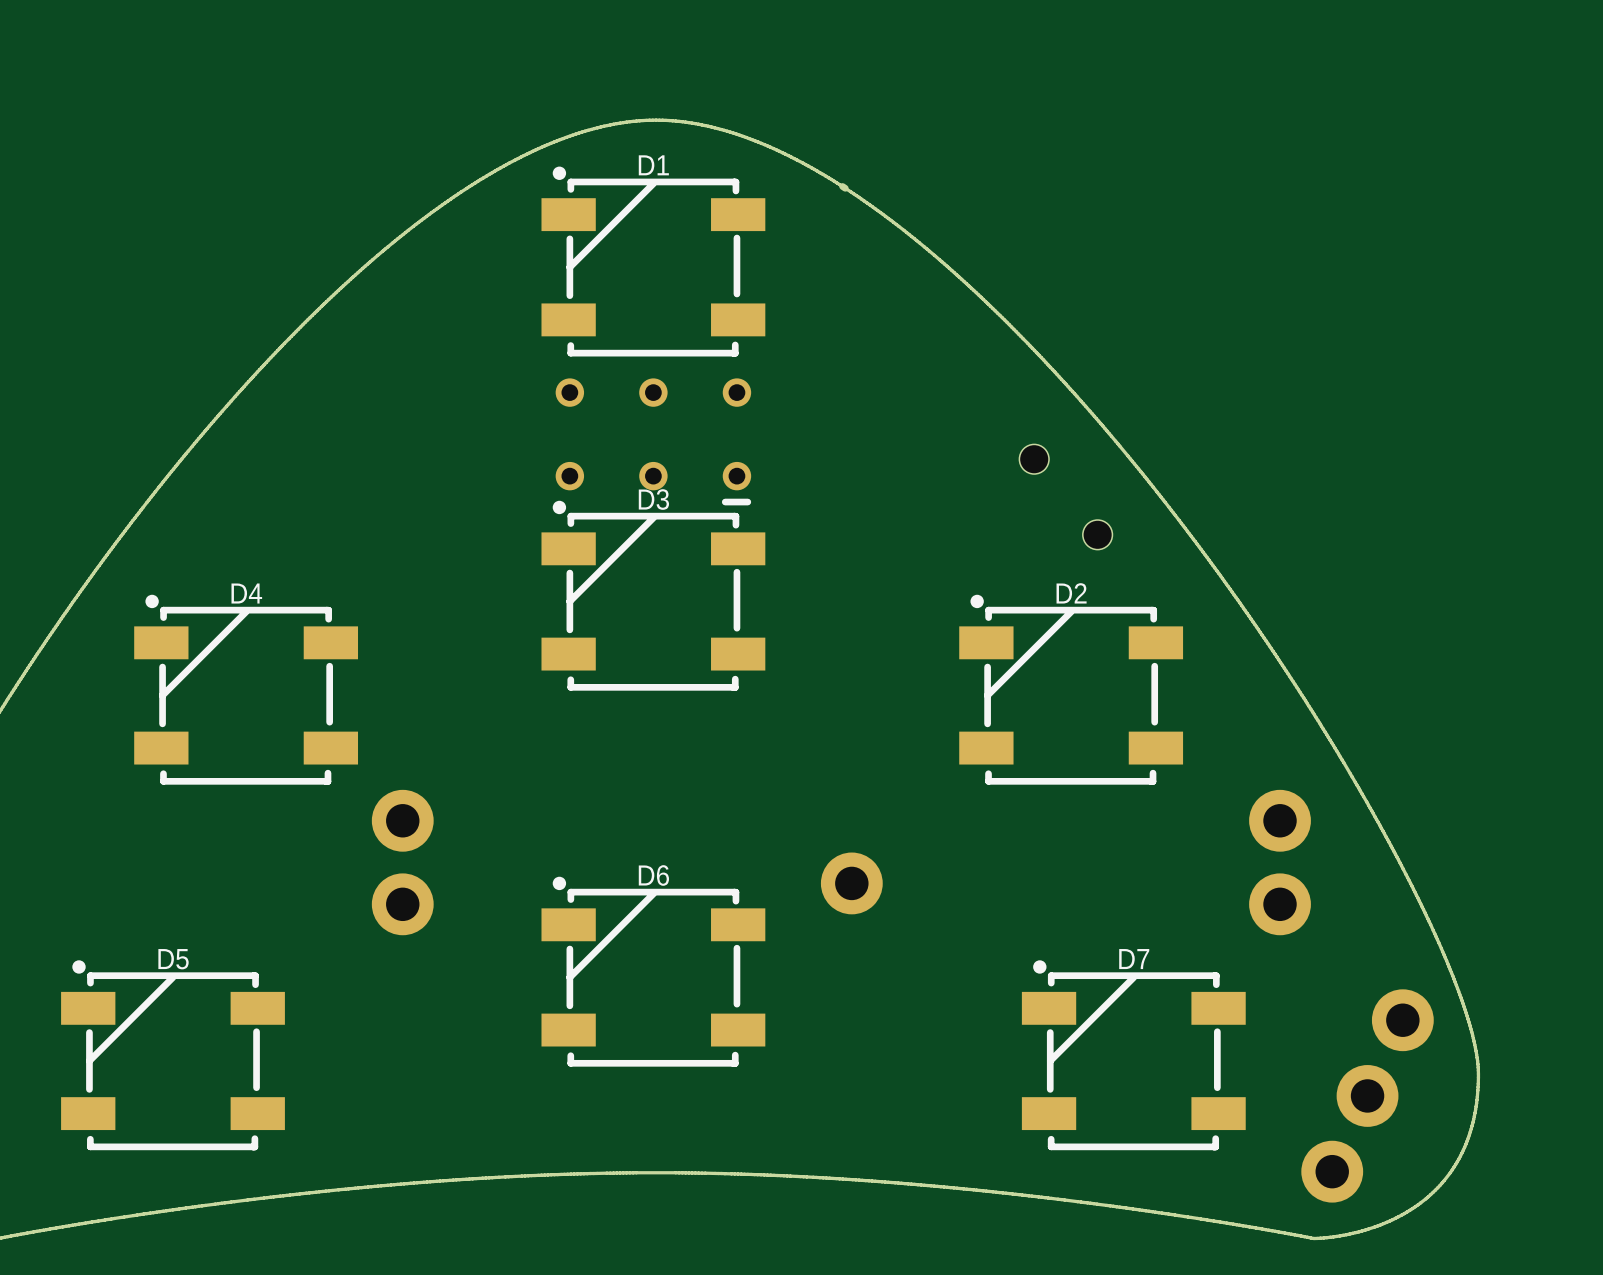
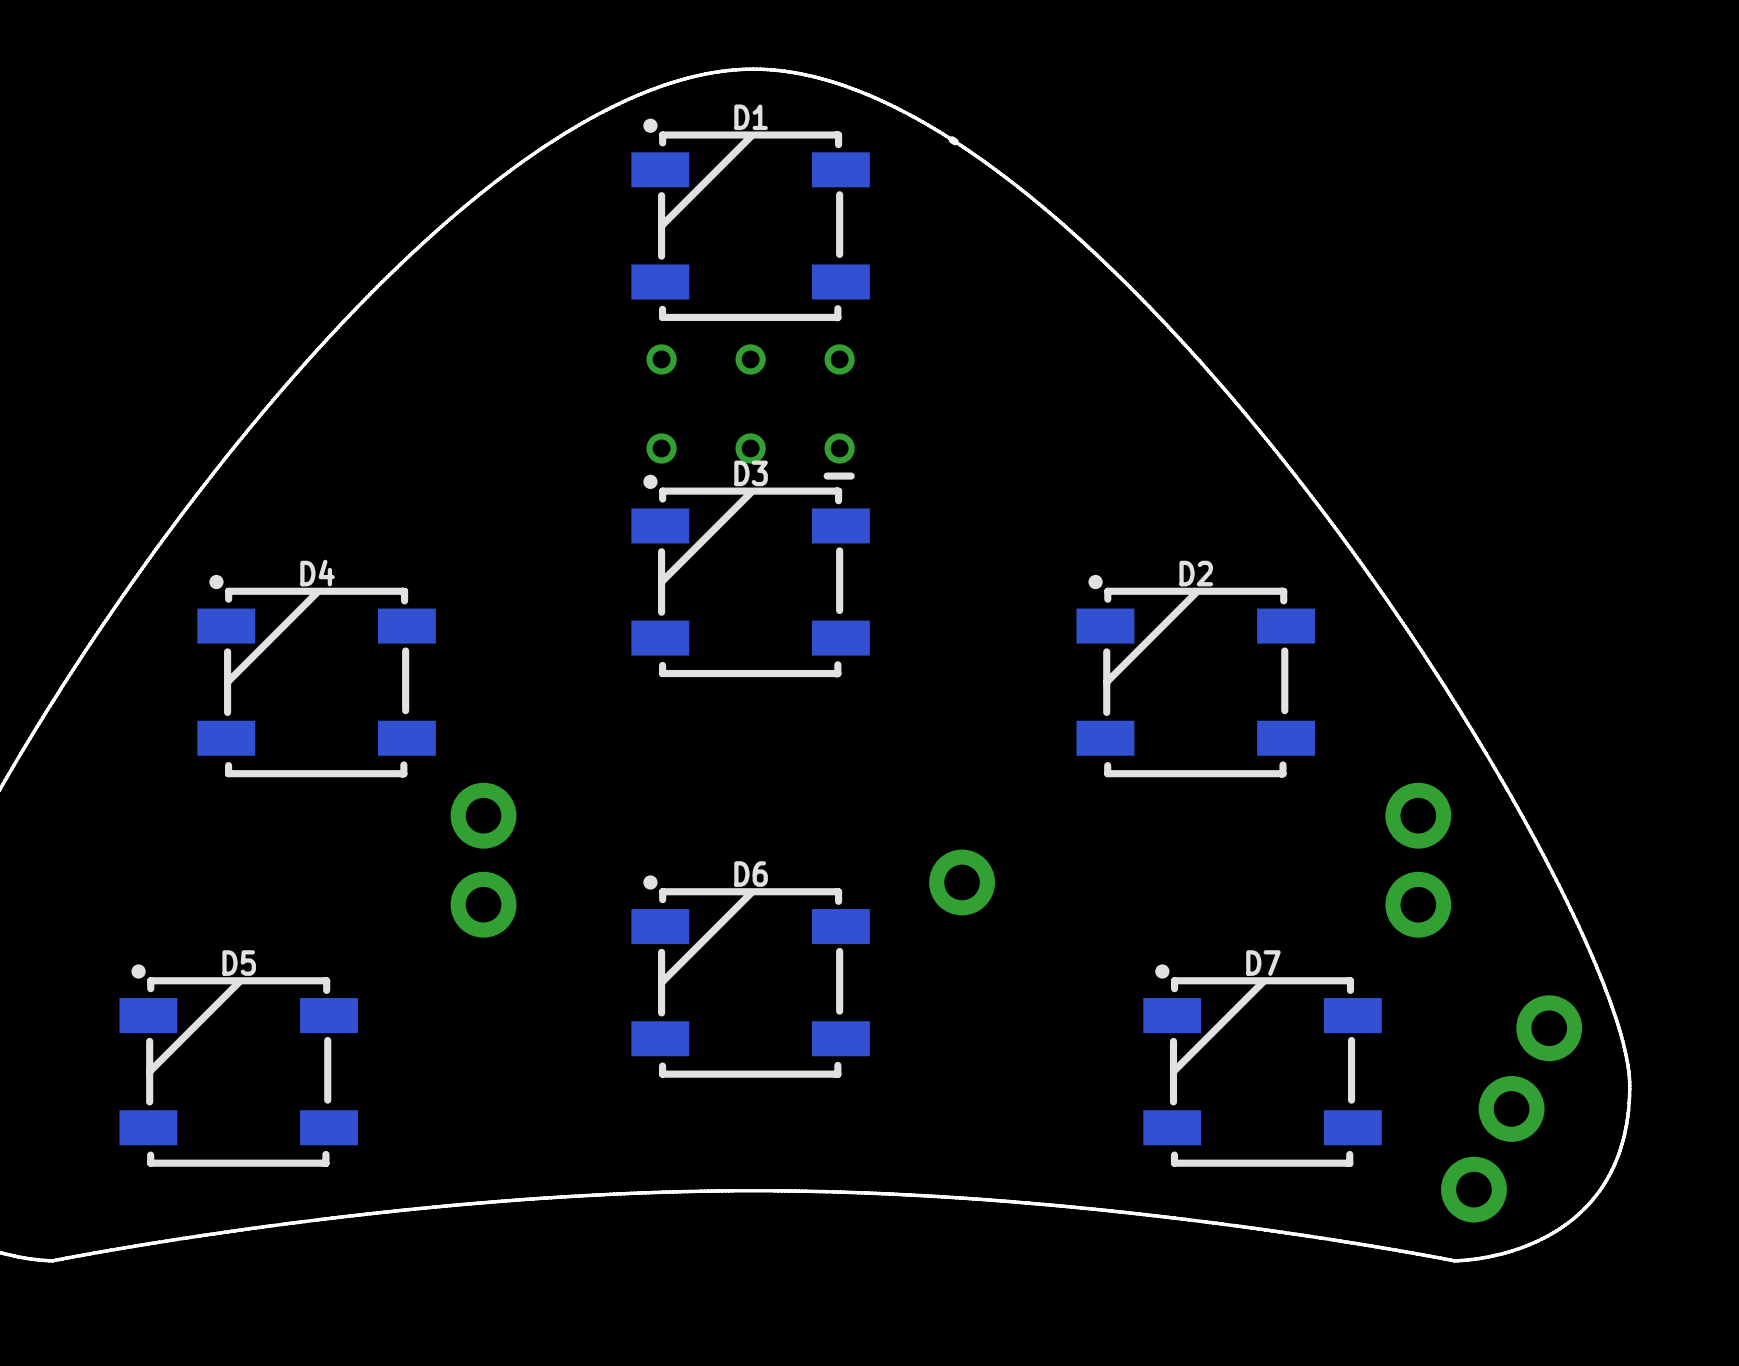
part: (1065, 497) -> none

